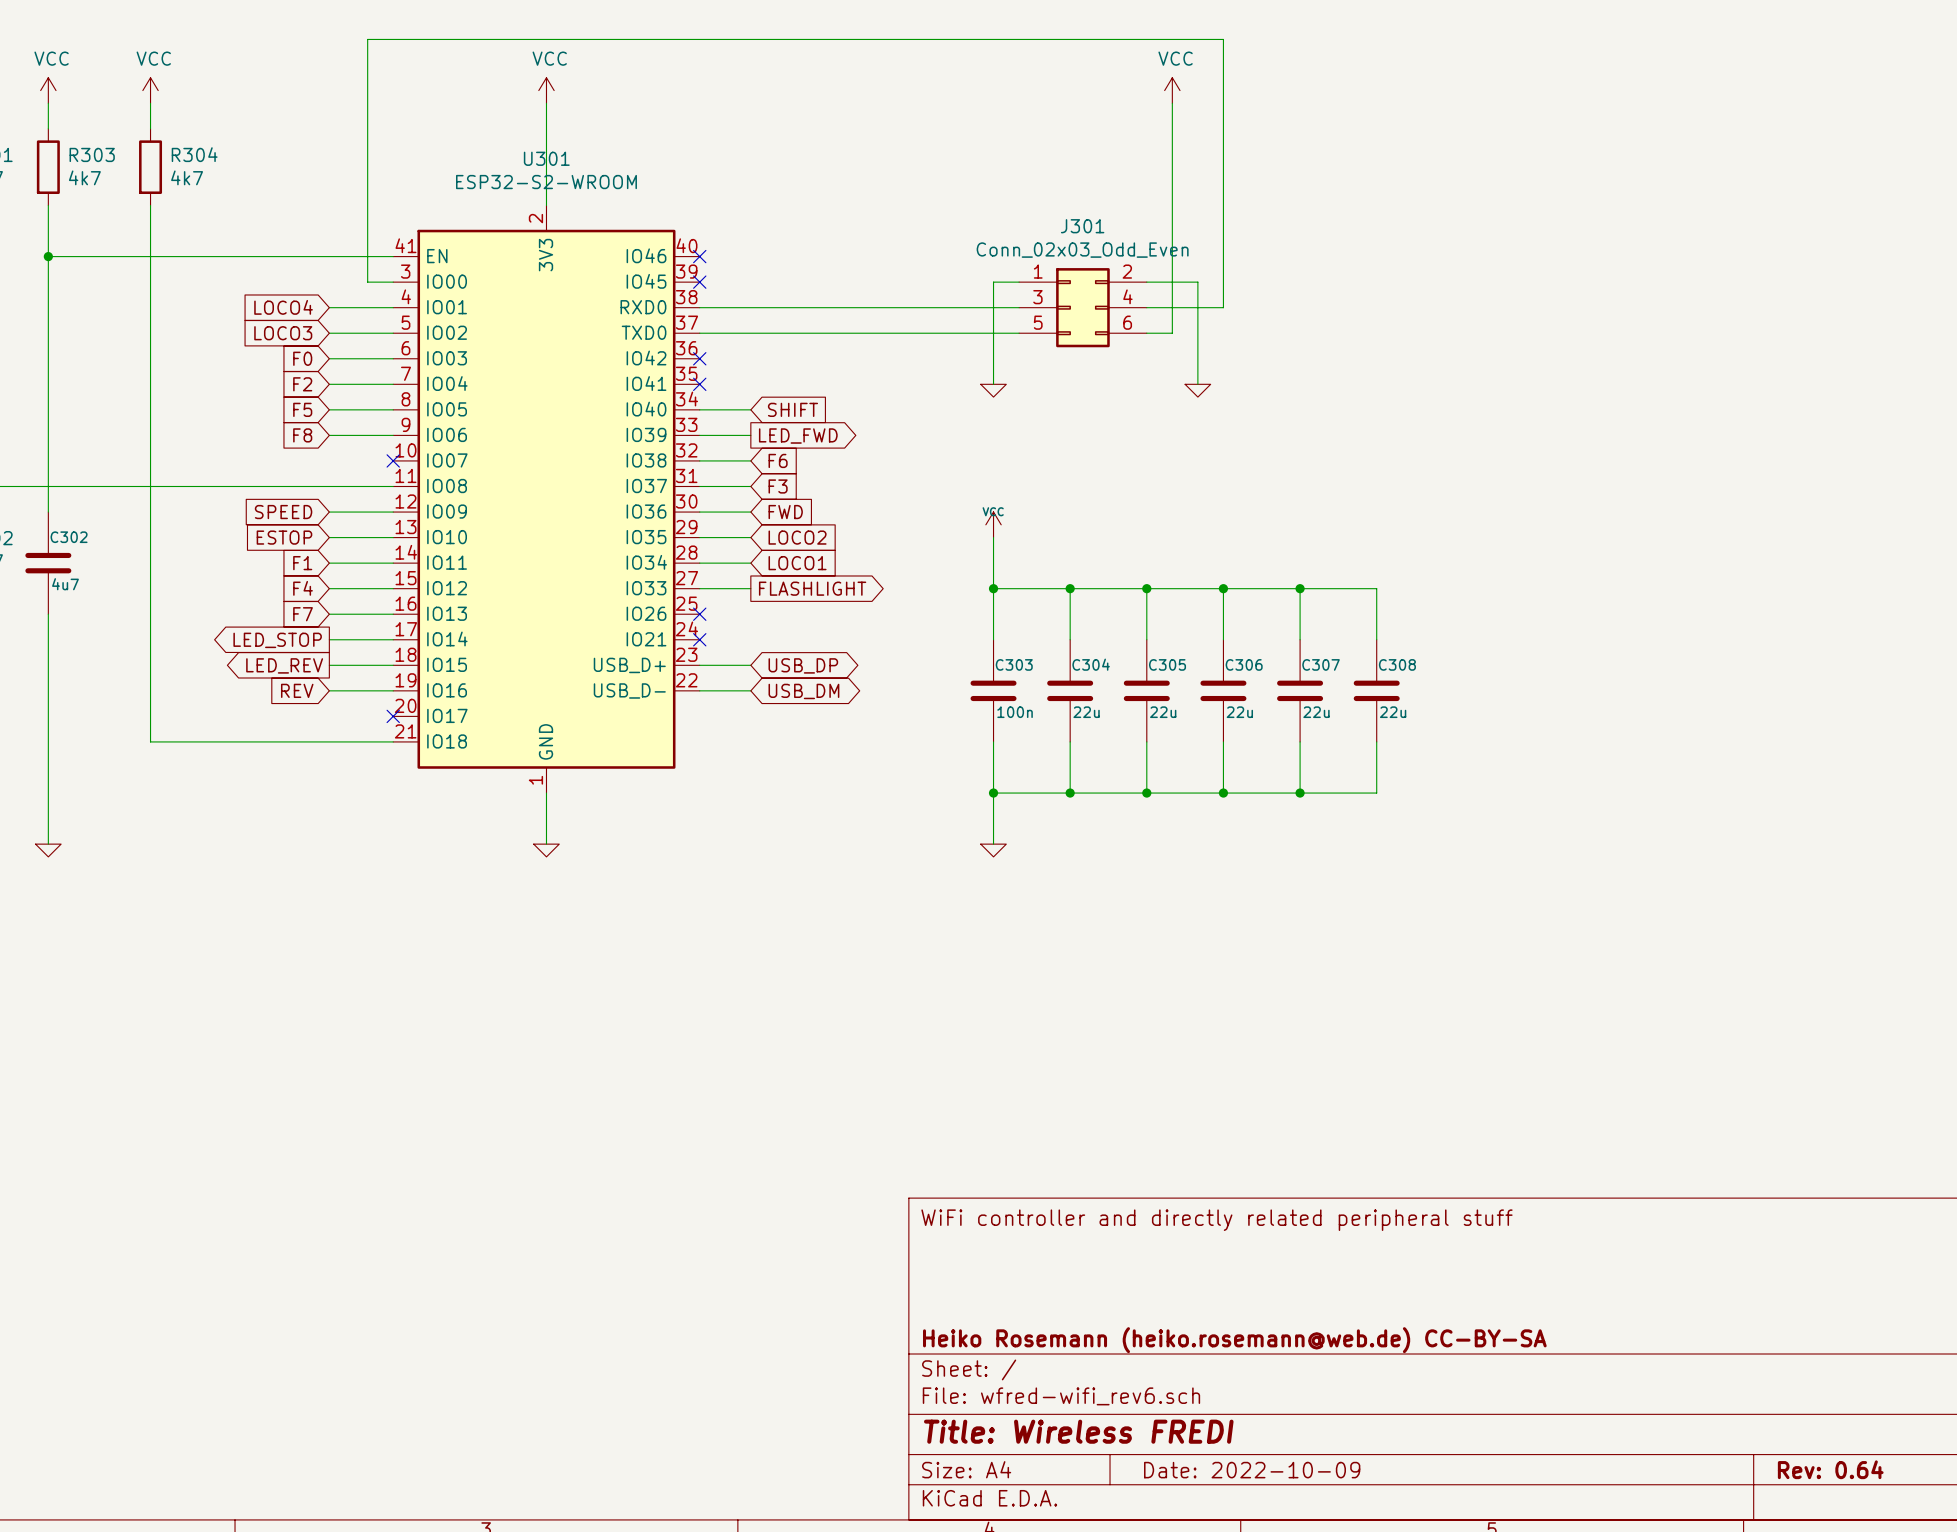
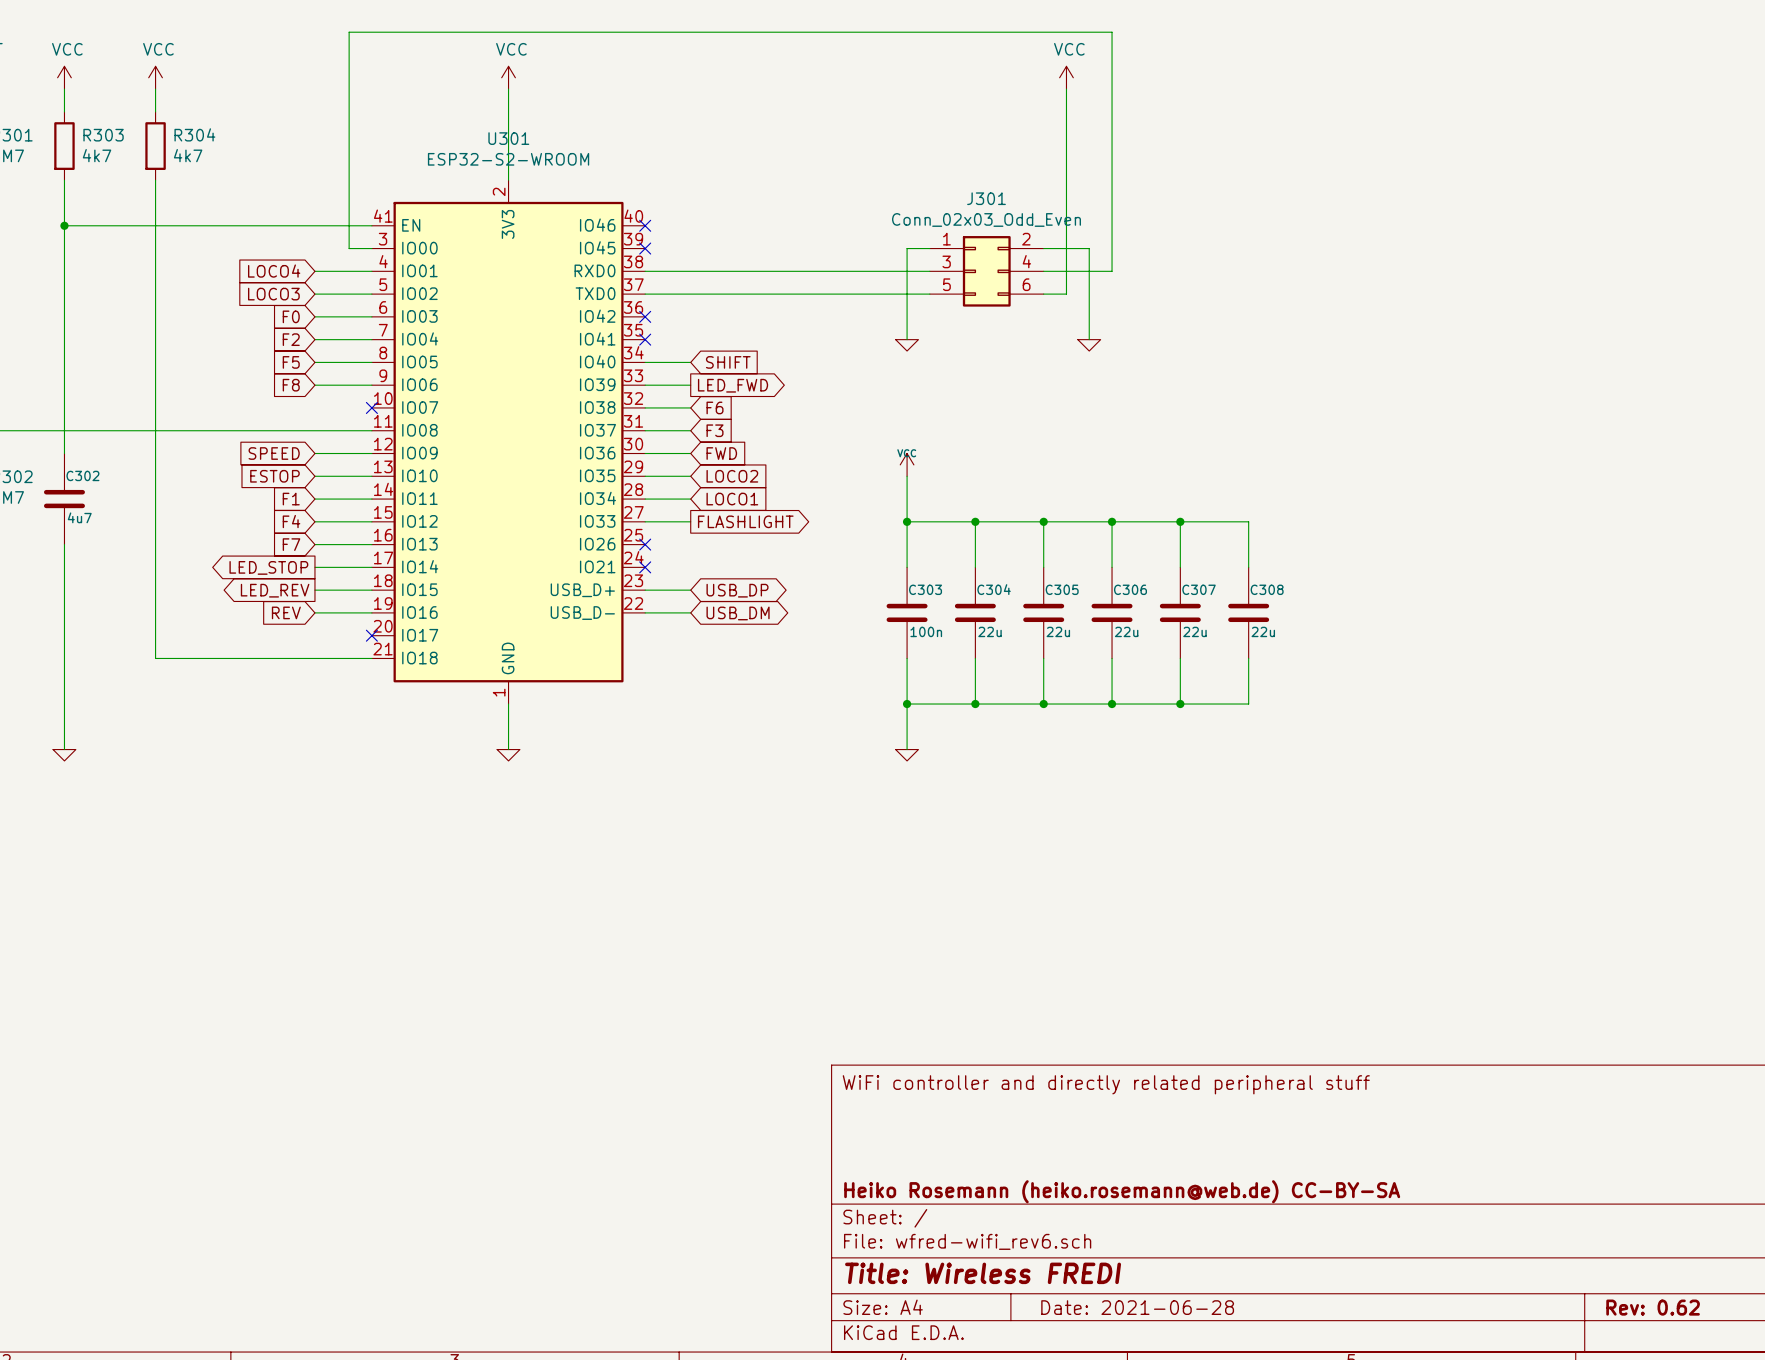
title block: Rev: 0.64 (1830, 1469) -> Rev: 0.62 (1653, 1307)
title block: Date: 2022-10-09 (1252, 1470) -> Date: 2021-06-28 (1137, 1307)

